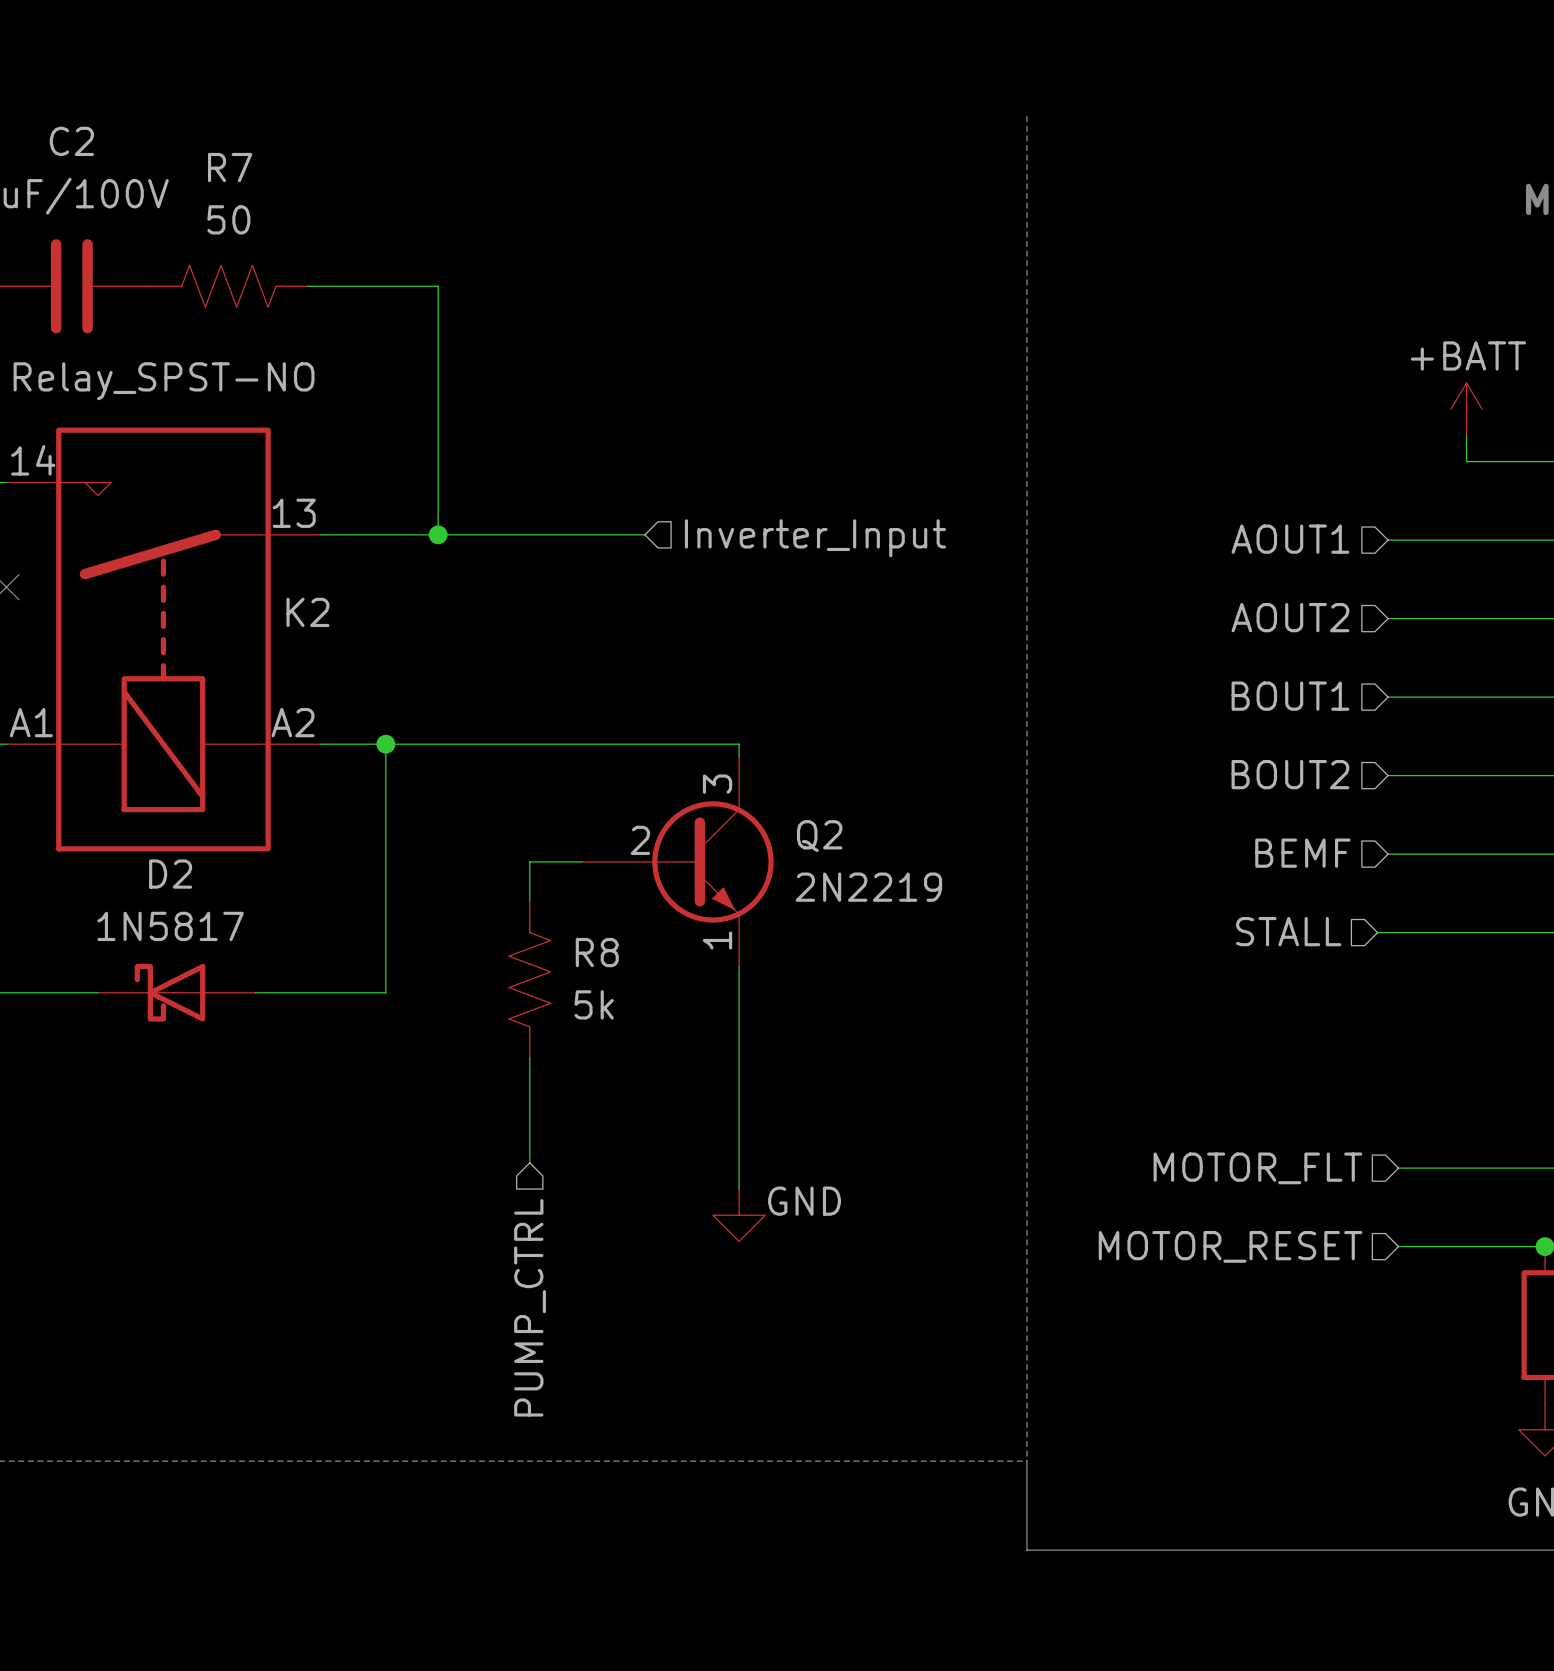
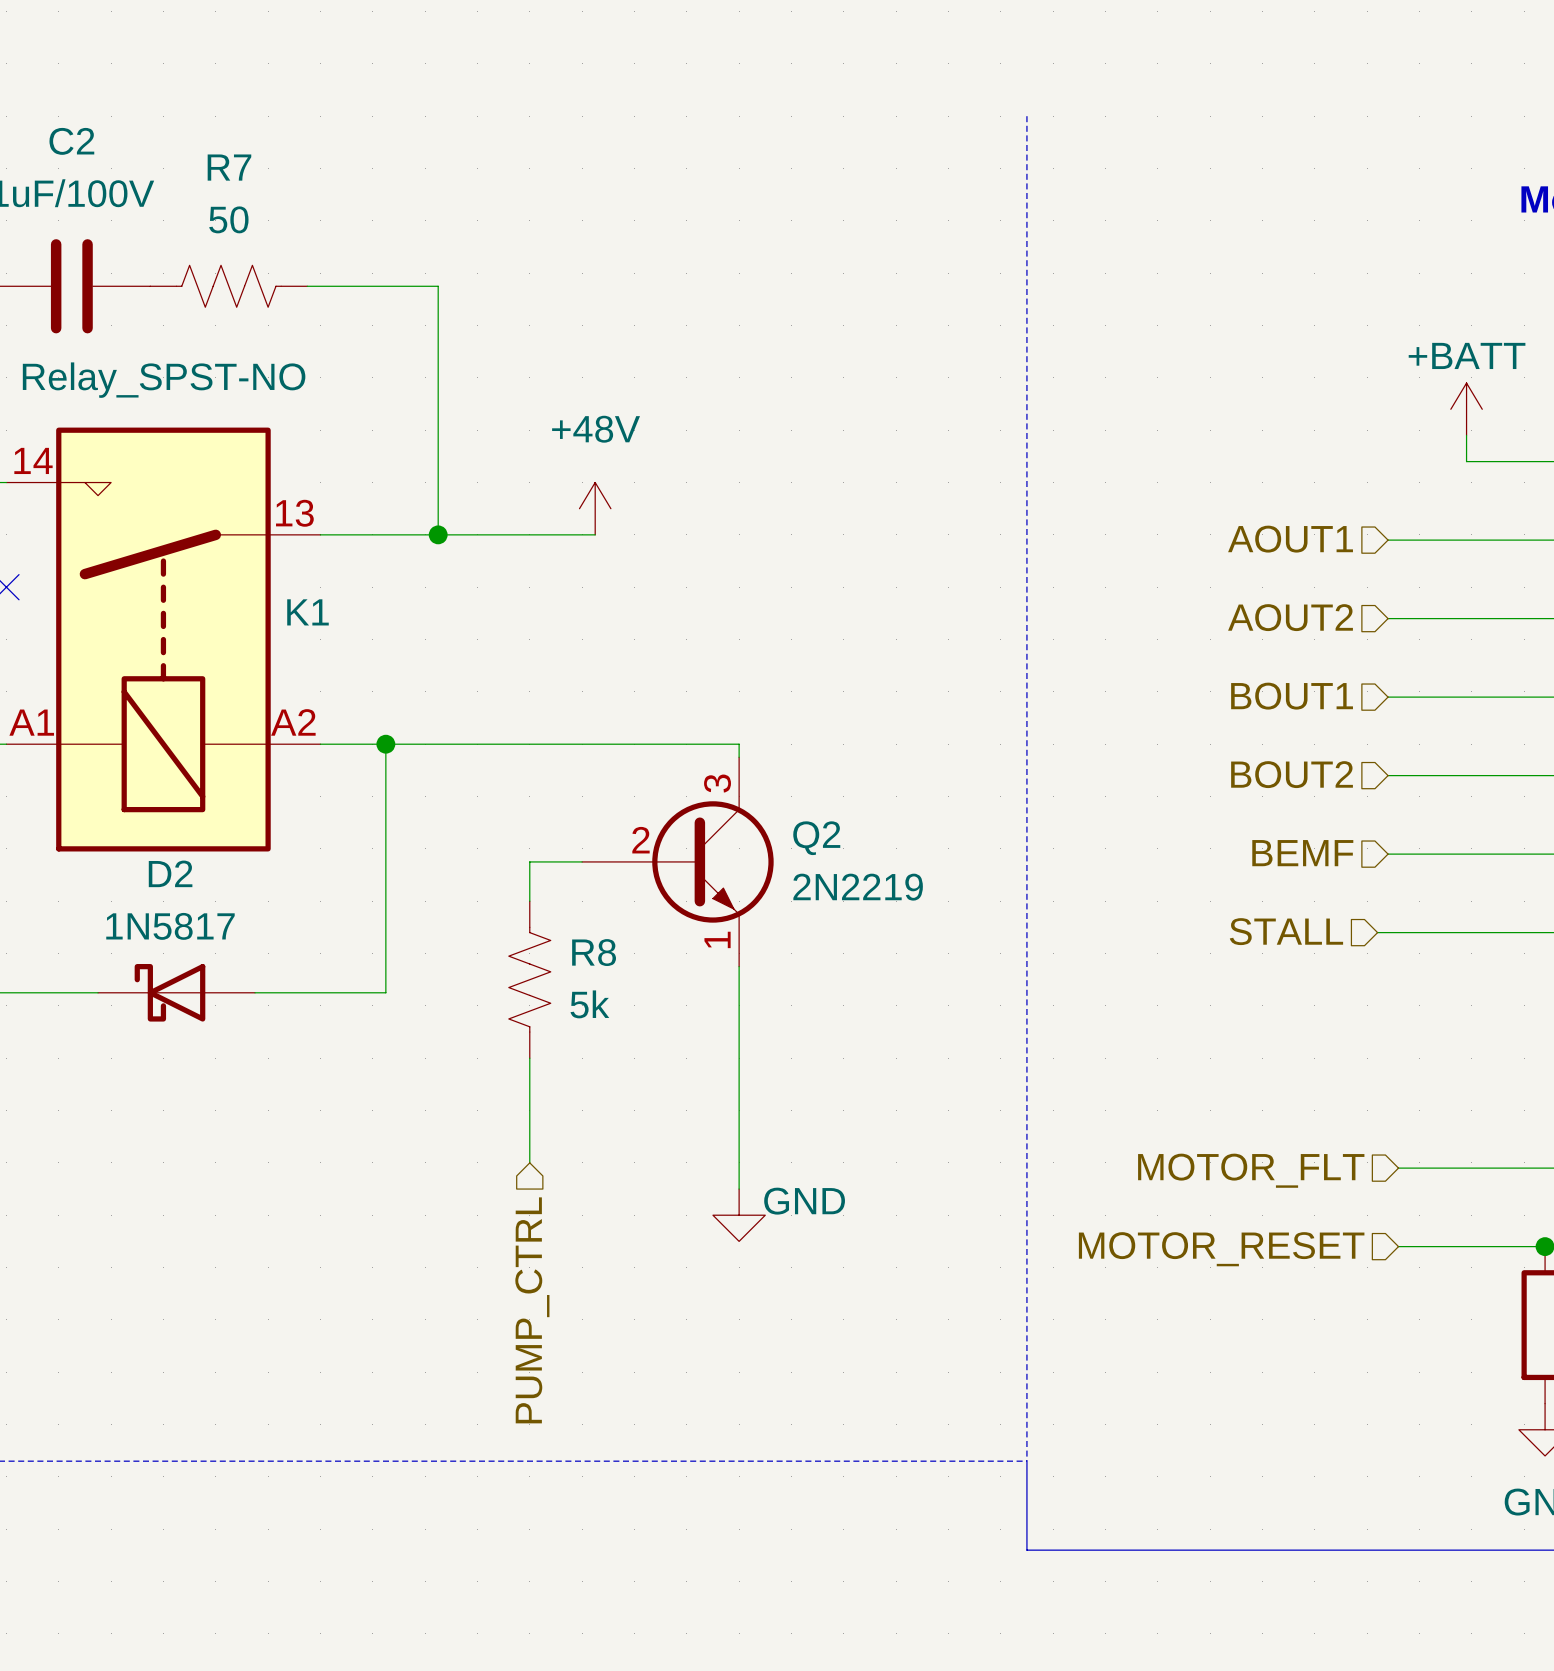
power symbol: none -> +48V (595, 508)
wire: (595, 534) (644, 534) -> none
hierarchical label: Inverter_Input (815, 538) -> none
K2 name: K2 (307, 612) -> K1 (307, 612)

